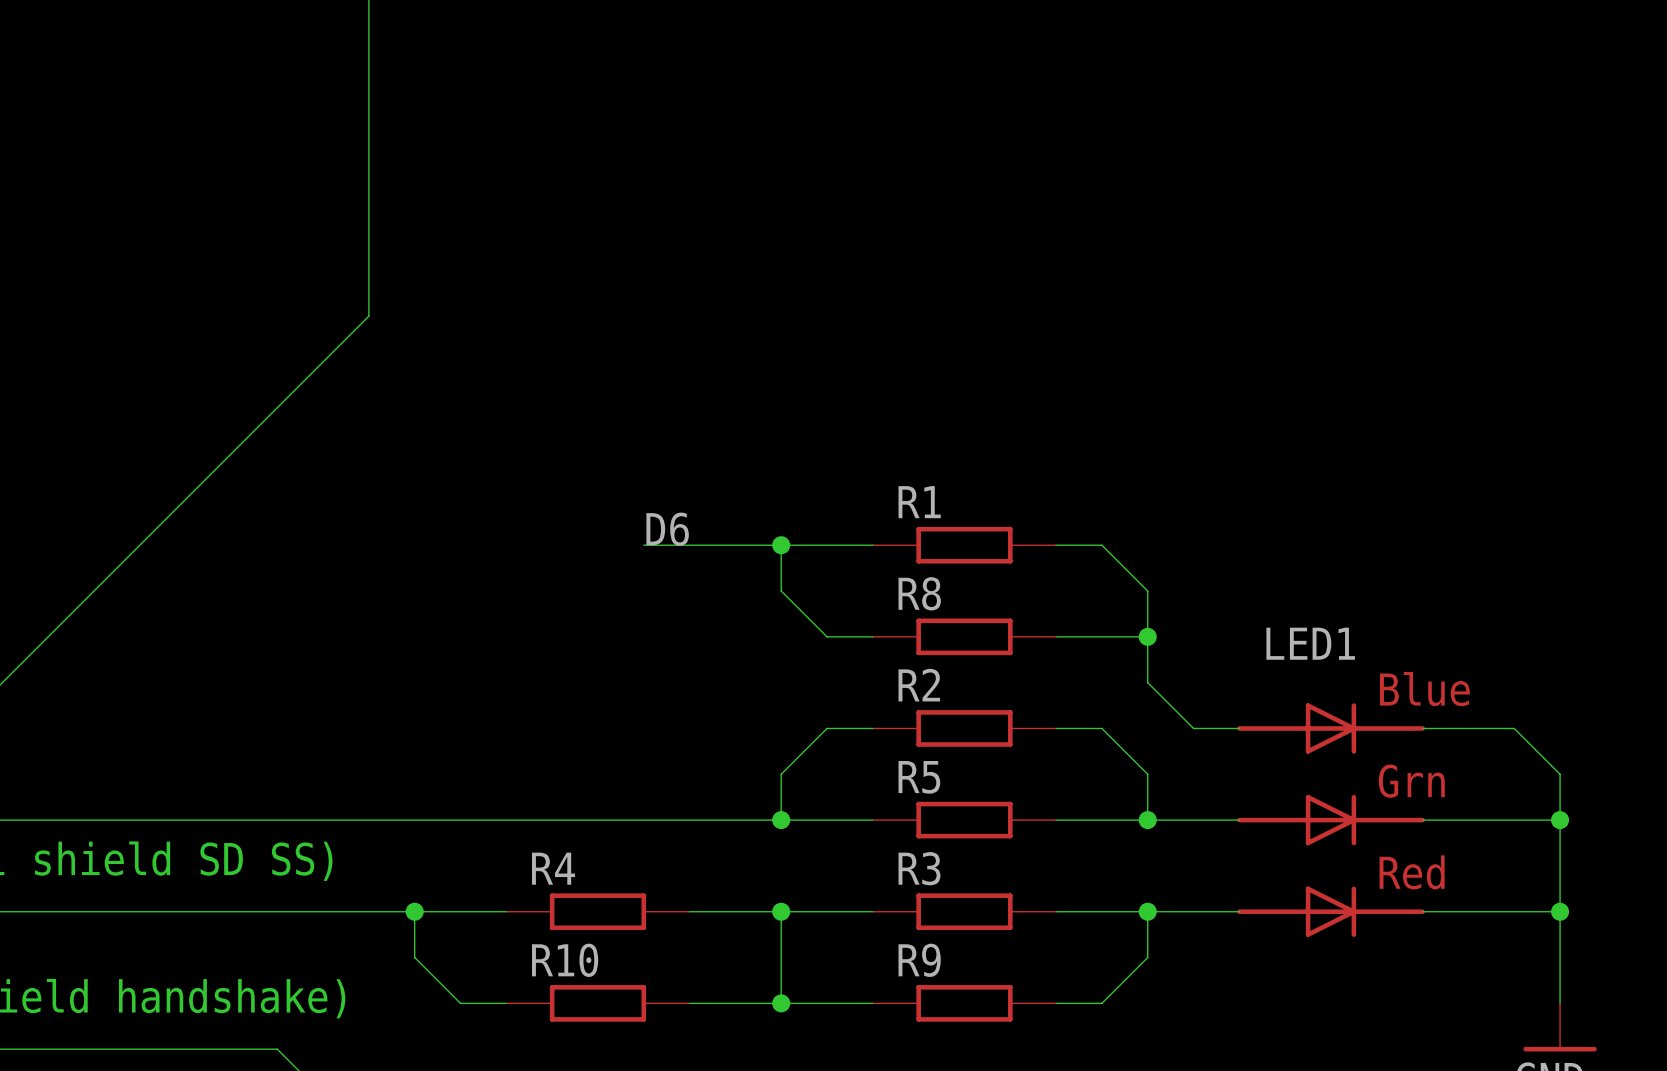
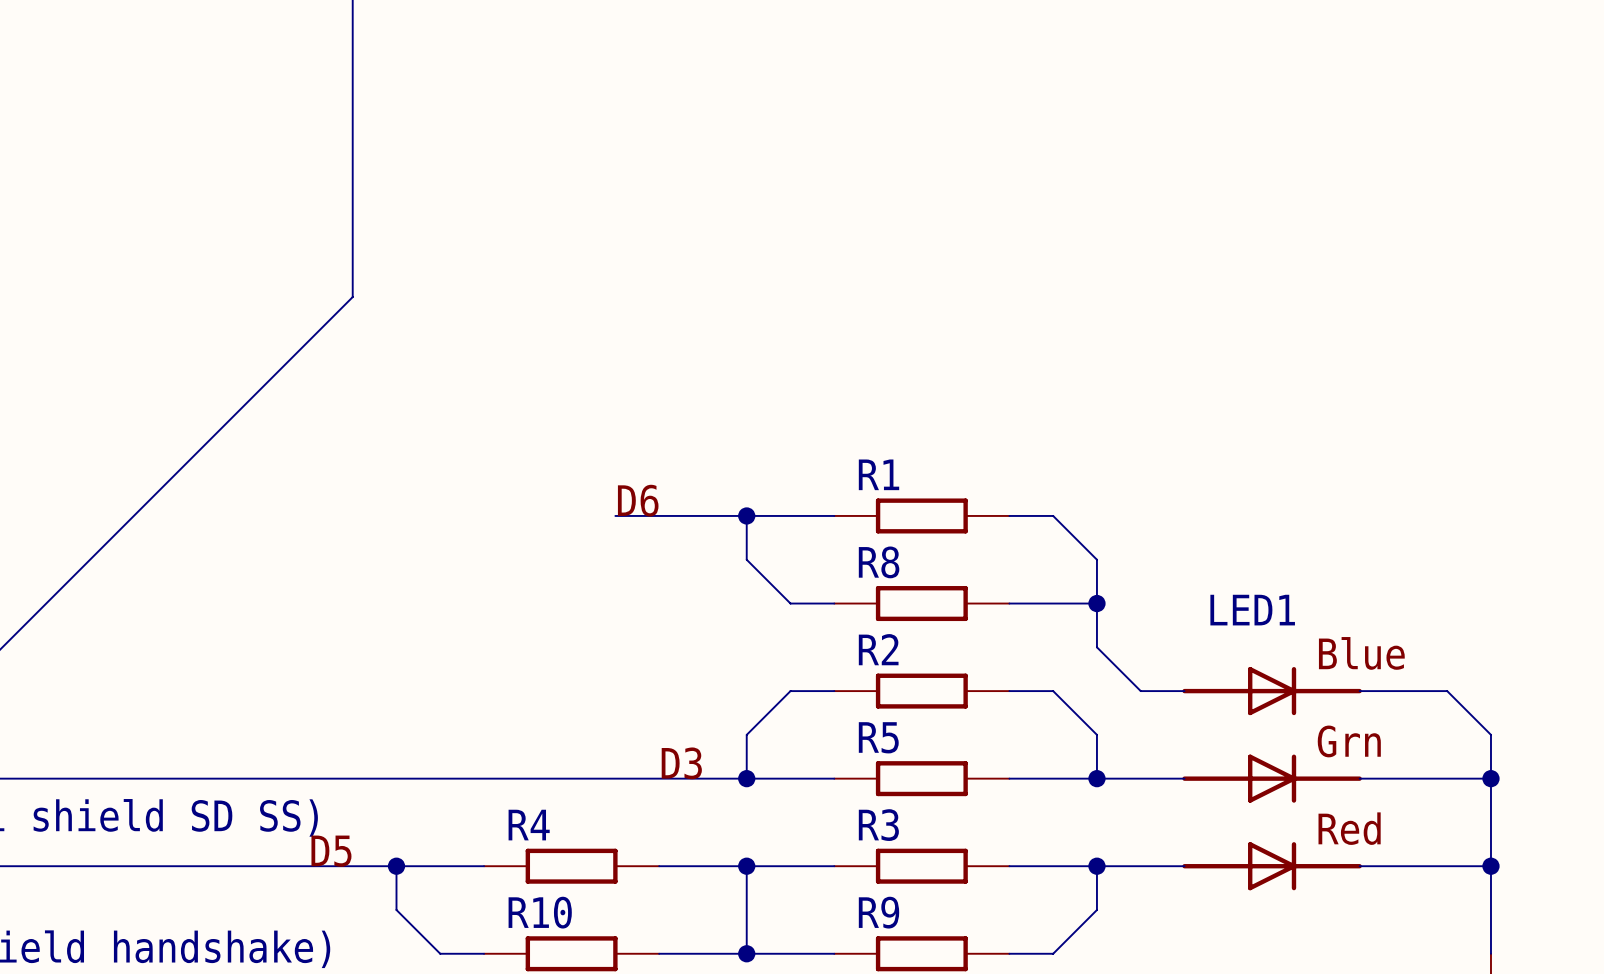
label: none -> D3 (681, 763)
label: none -> D5 (331, 851)

